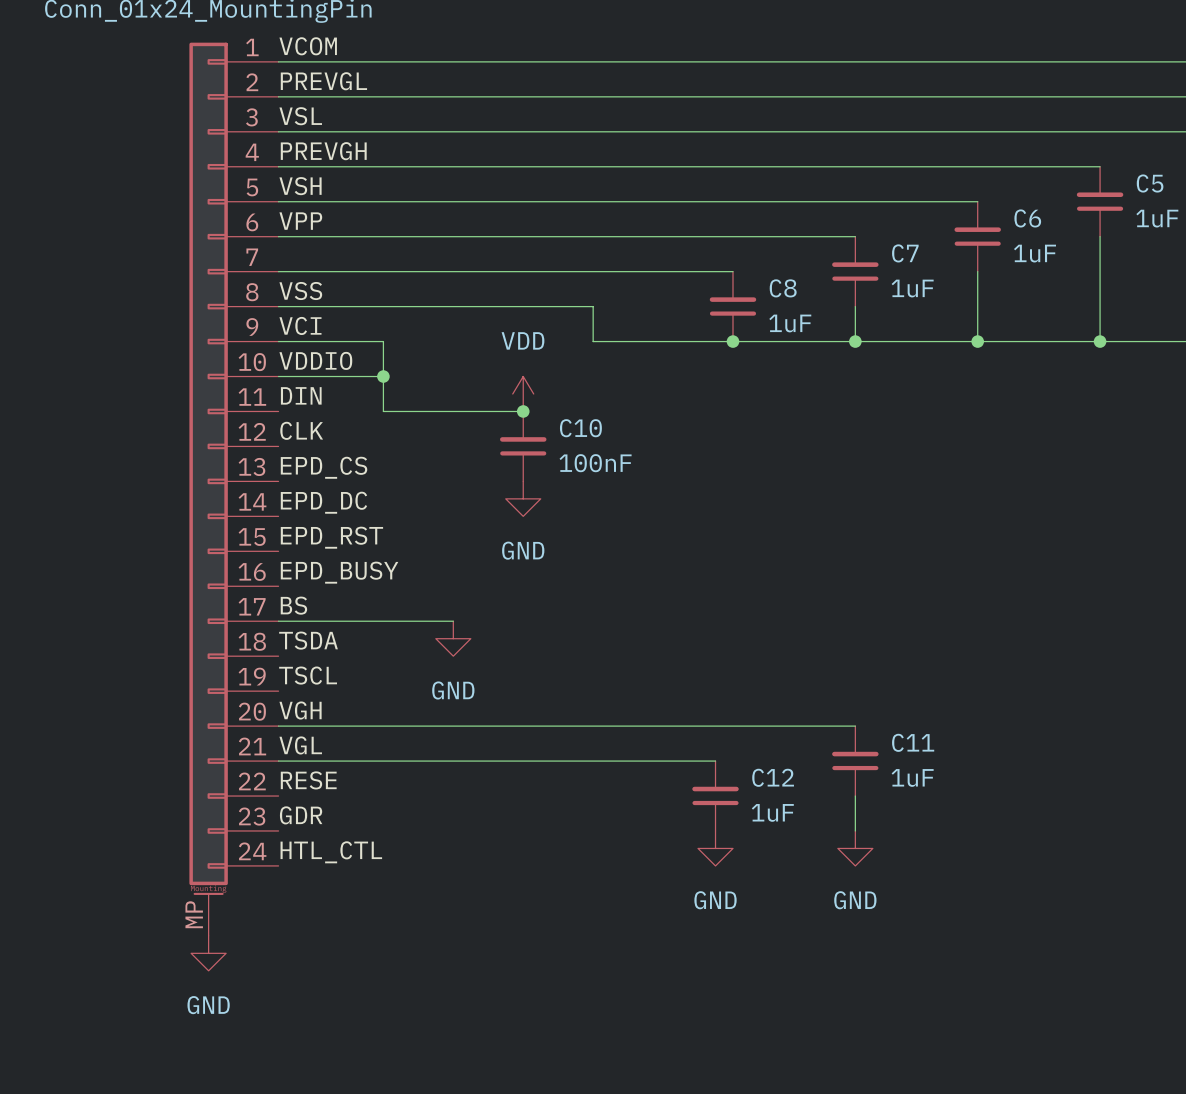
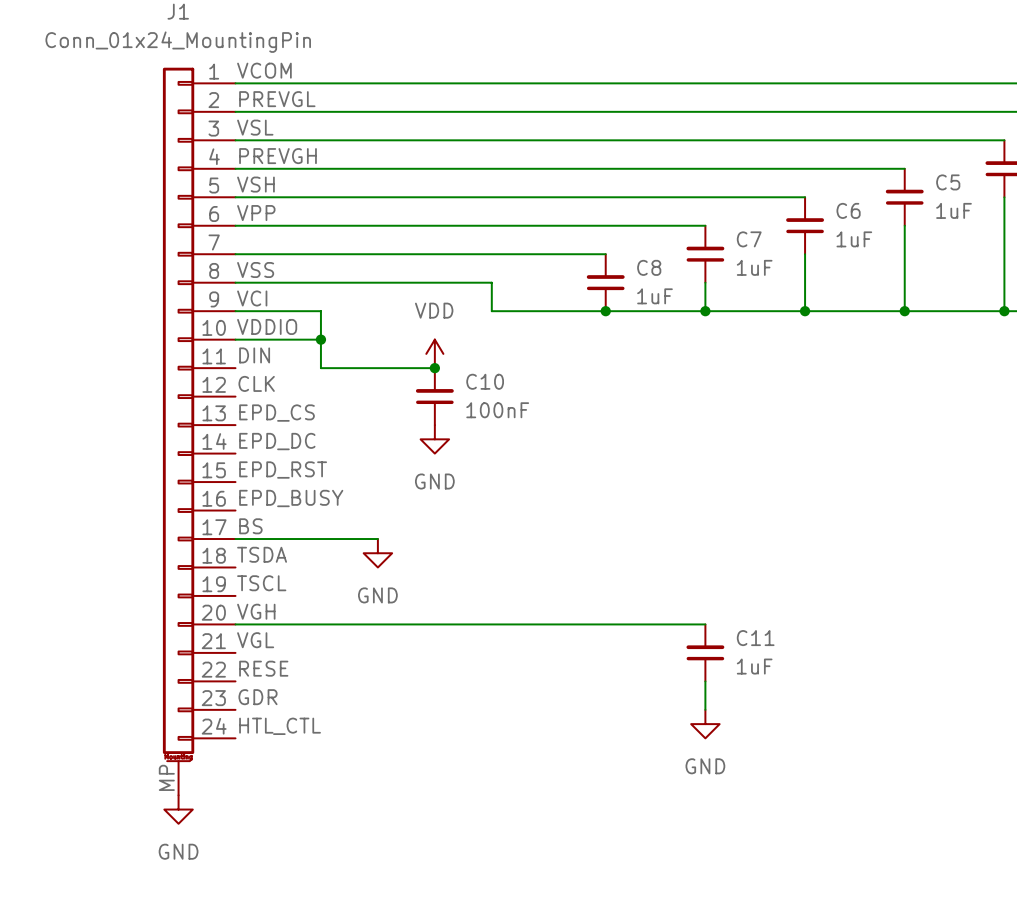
wire: (278, 761) (715, 761) -> none
C12: 1uF (715, 796) -> none
power symbol: GND (715, 848) -> none

